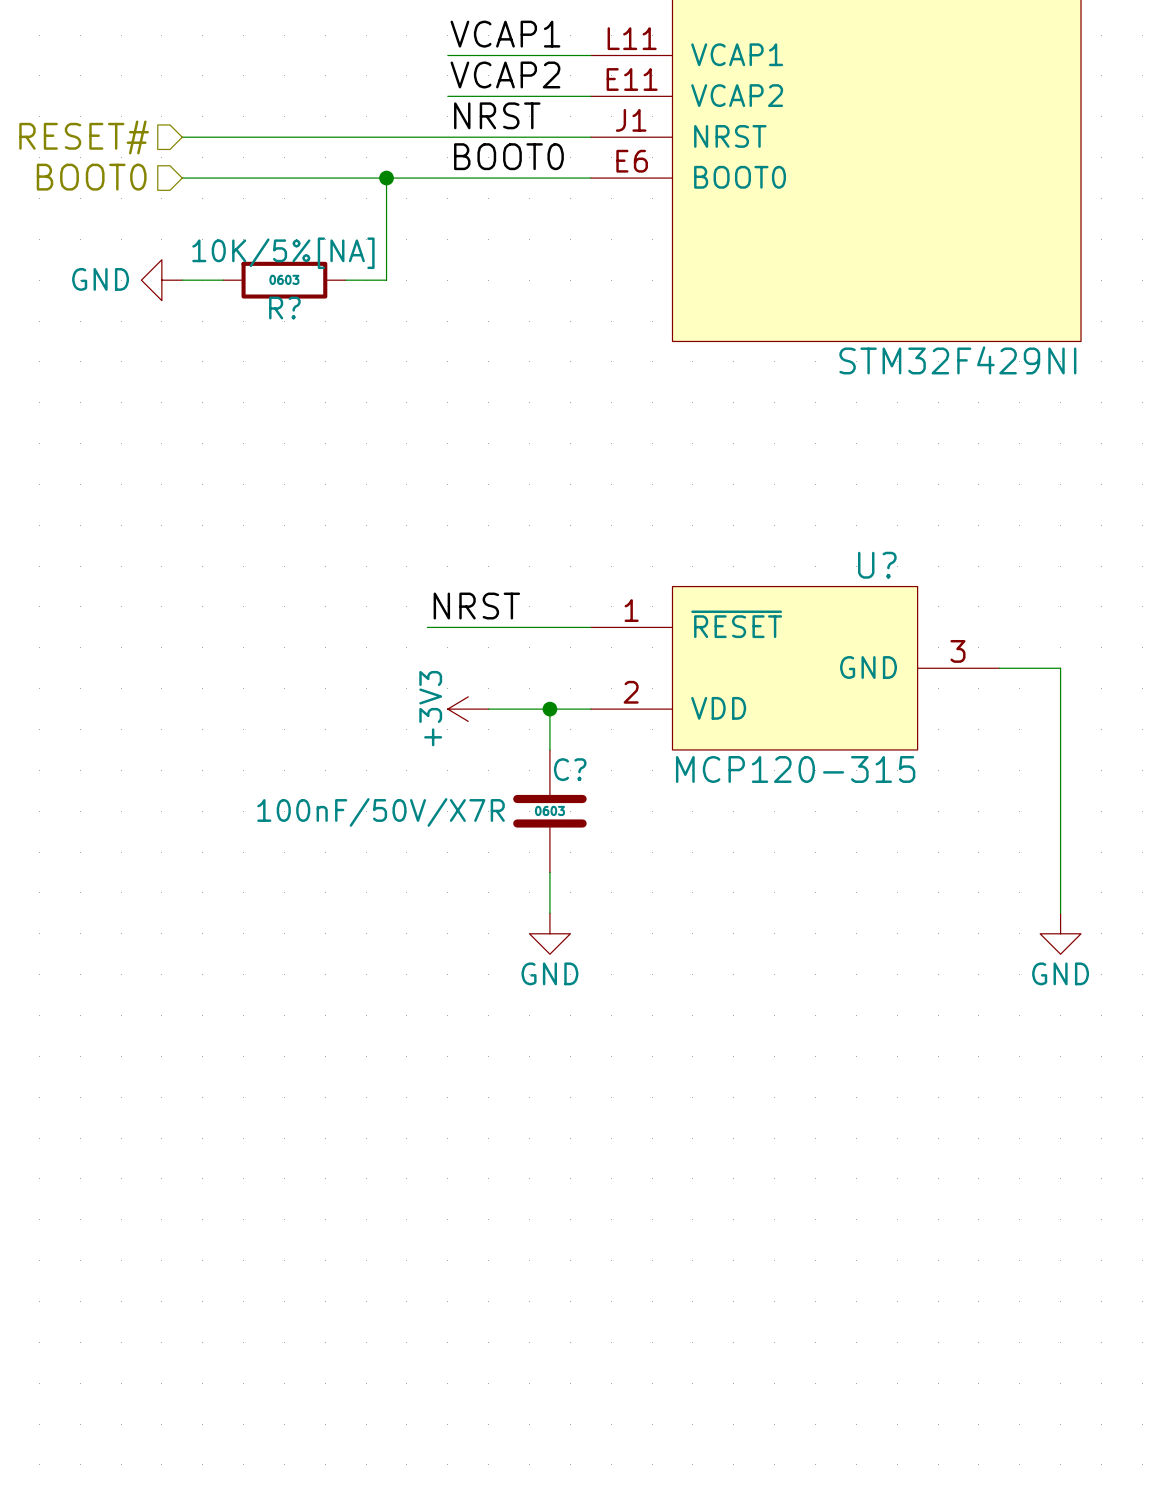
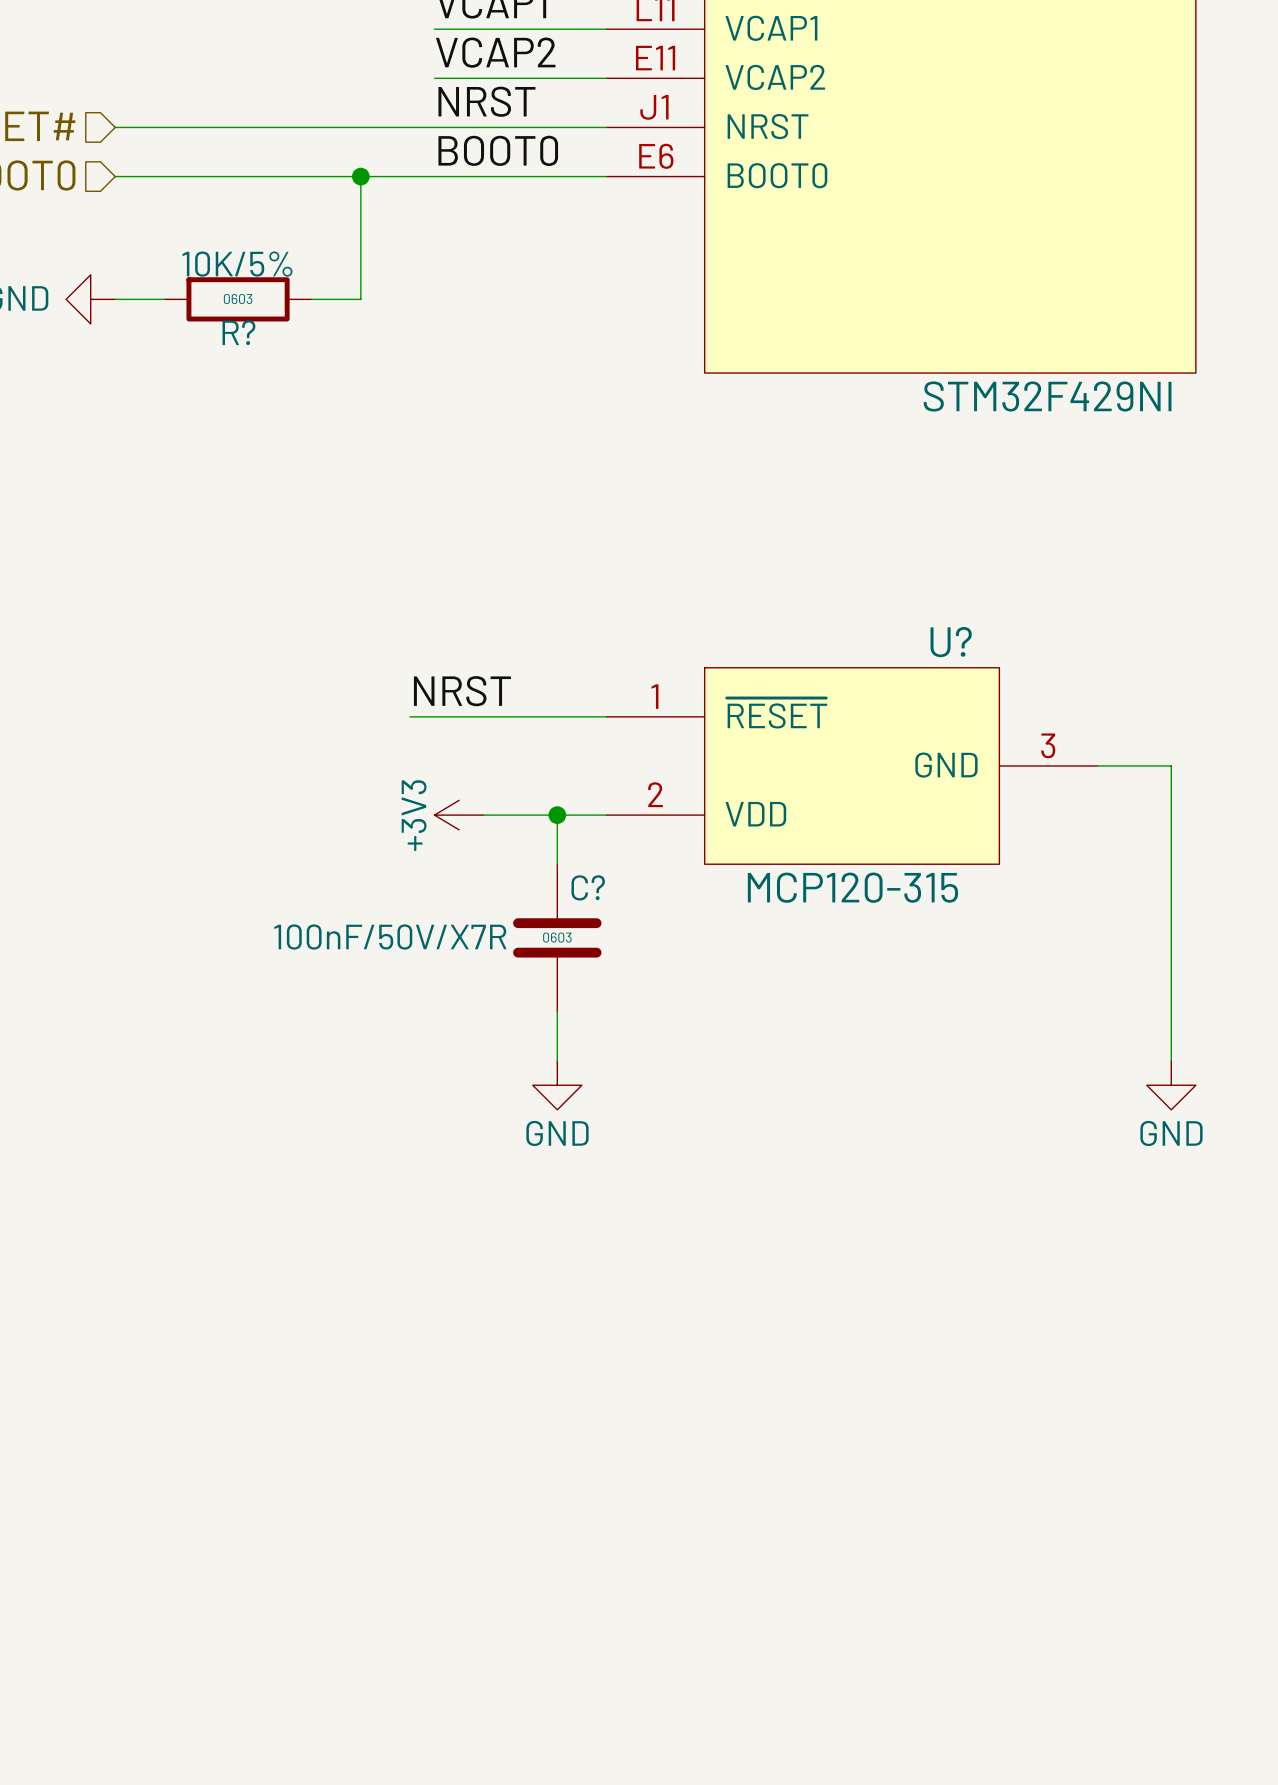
R? value: 10K/5%[NA] (283, 253) -> 10K/5% (237, 264)

